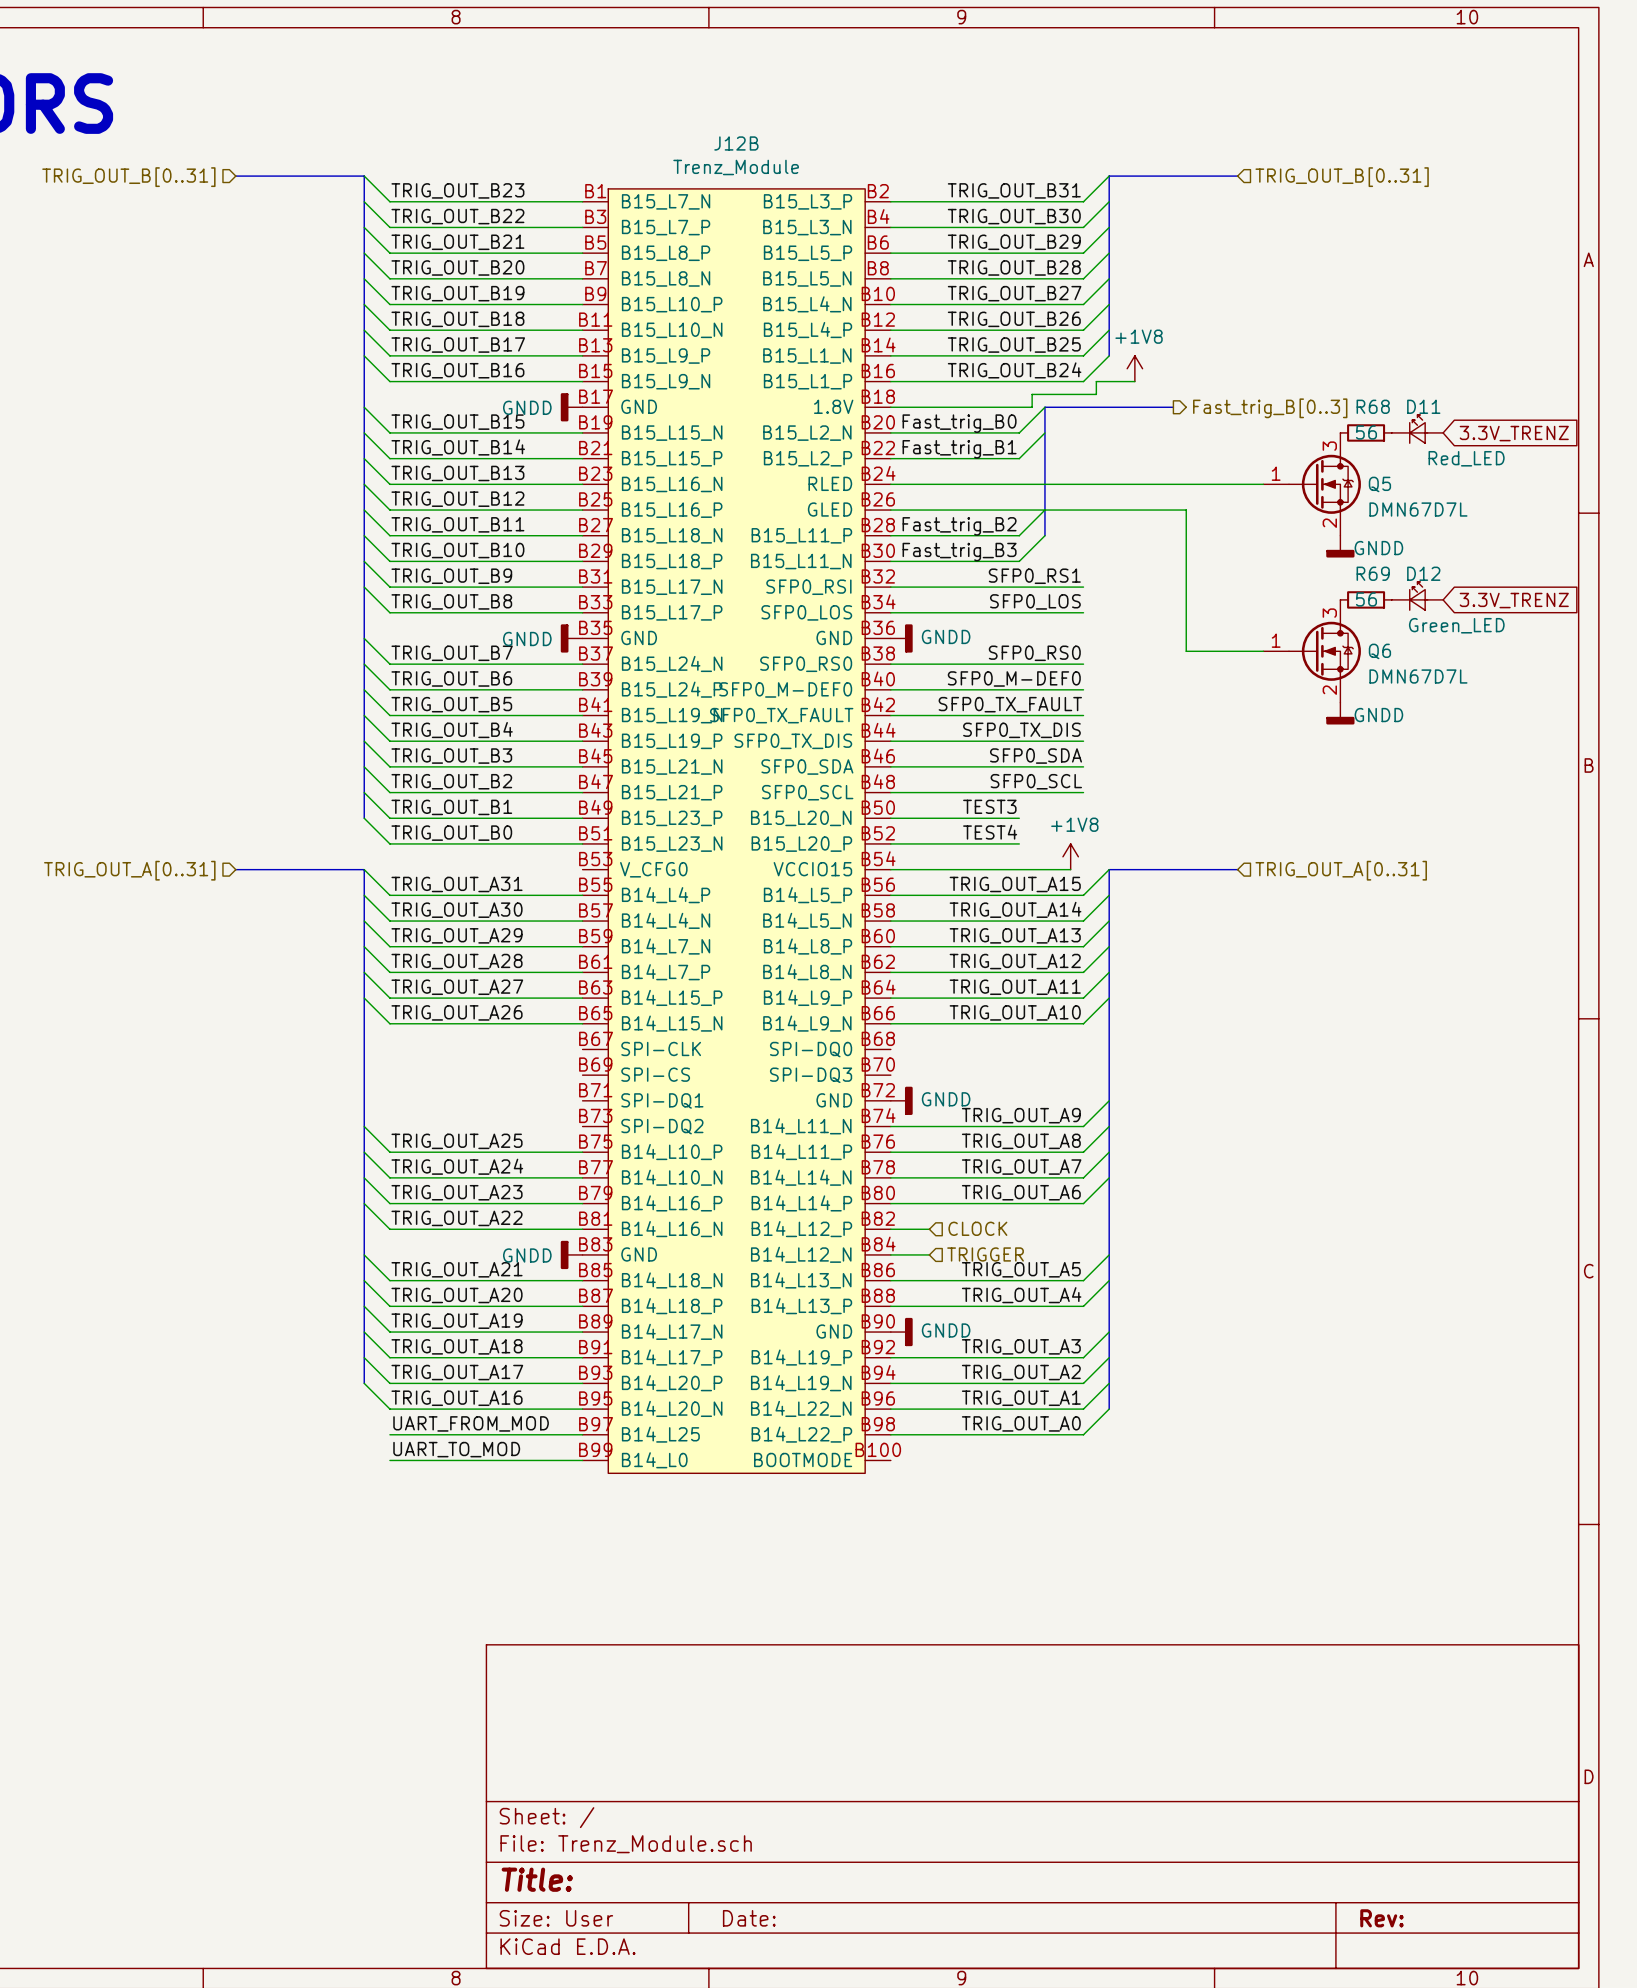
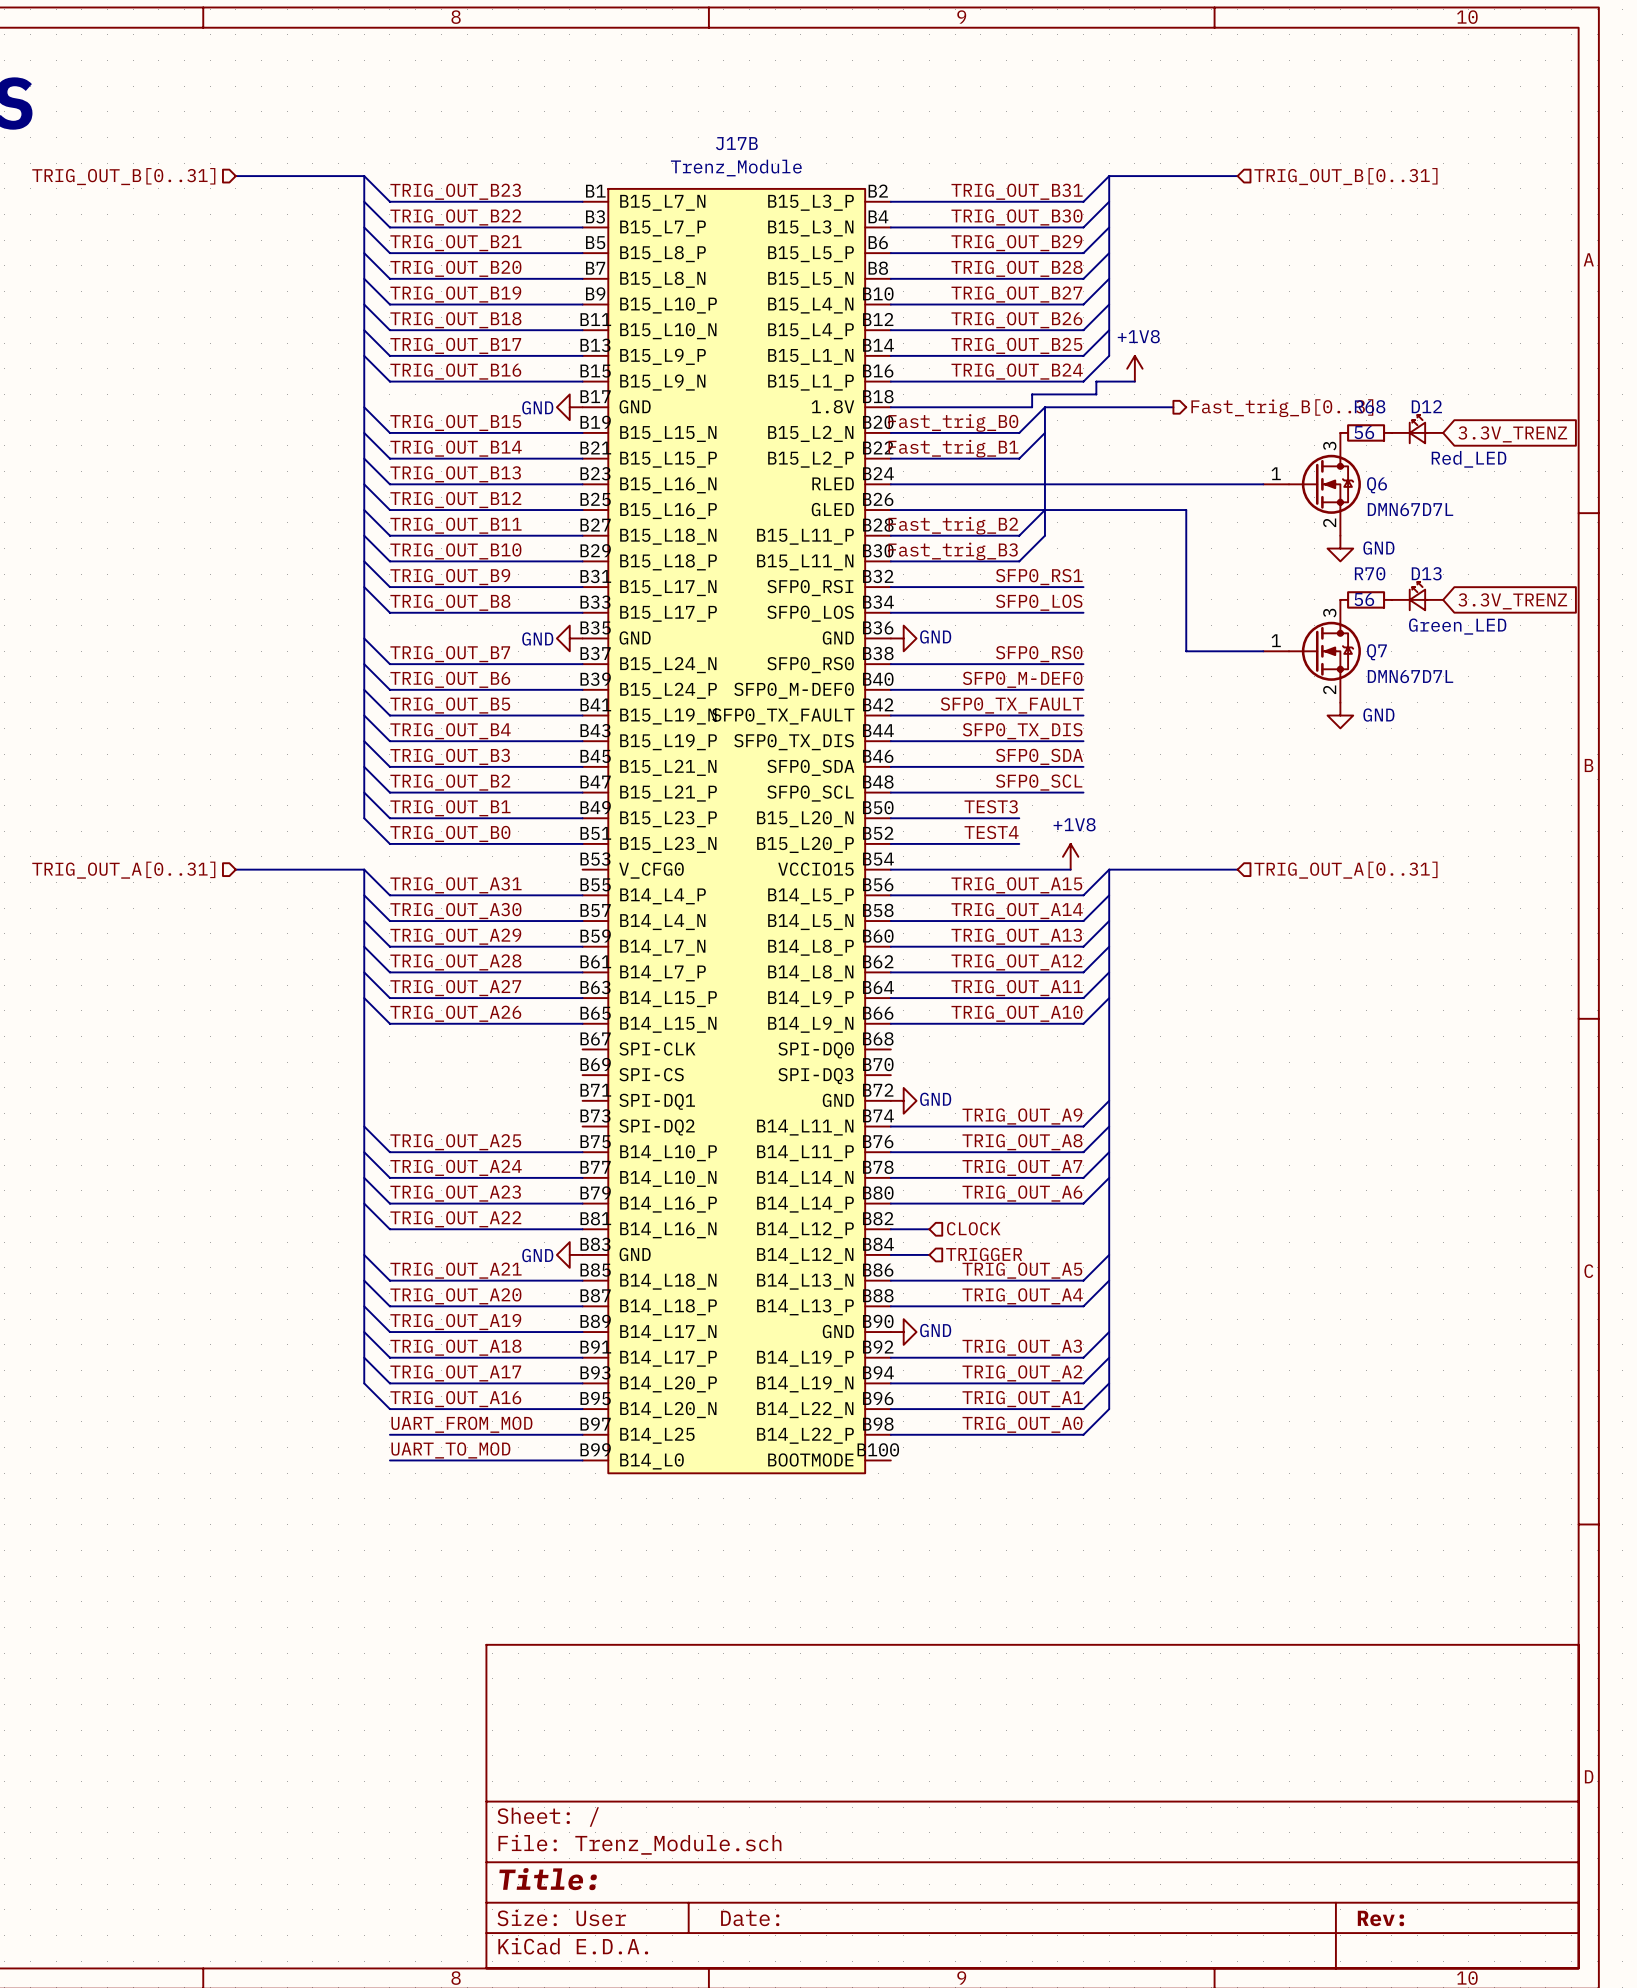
J12B name: J12B (736, 143) -> J17B (736, 143)
D11 name: D11 (1423, 406) -> D12 (1426, 406)
power symbol: GNDD (571, 407) -> GND (569, 407)
Q5 name: Q5 (1379, 484) -> Q6 (1377, 485)
power symbol: GNDD (1340, 546) -> GND (1340, 548)
R69 name: R69 (1373, 573) -> R70 (1370, 573)
D12 name: D12 (1423, 573) -> D13 (1426, 573)
power symbol: GNDD (571, 638) -> GND (569, 638)
power symbol: GNDD (901, 638) -> GND (903, 638)
Q6 name: Q6 (1379, 651) -> Q7 (1376, 652)
power symbol: GNDD (1340, 713) -> GND (1340, 715)
power symbol: GNDD (901, 1100) -> GND (903, 1100)
power symbol: GNDD (571, 1254) -> GND (569, 1254)
power symbol: GNDD (901, 1332) -> GND (903, 1332)

